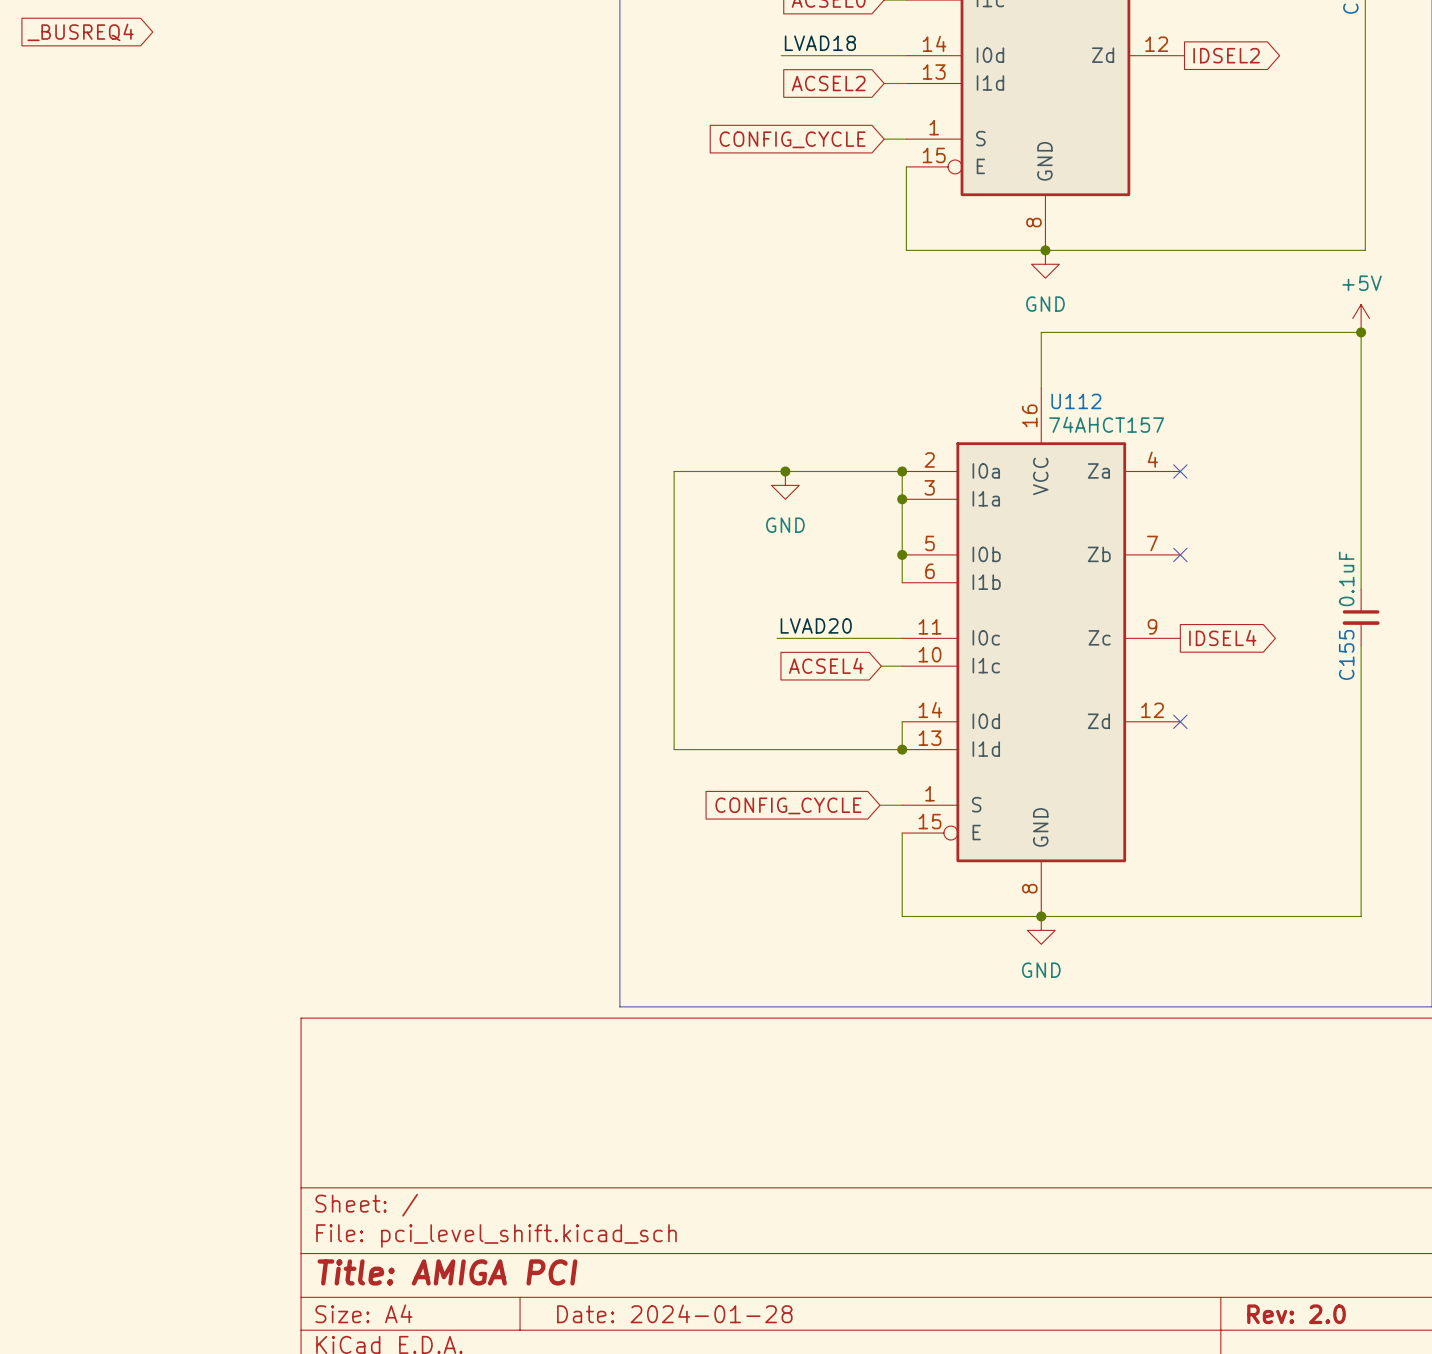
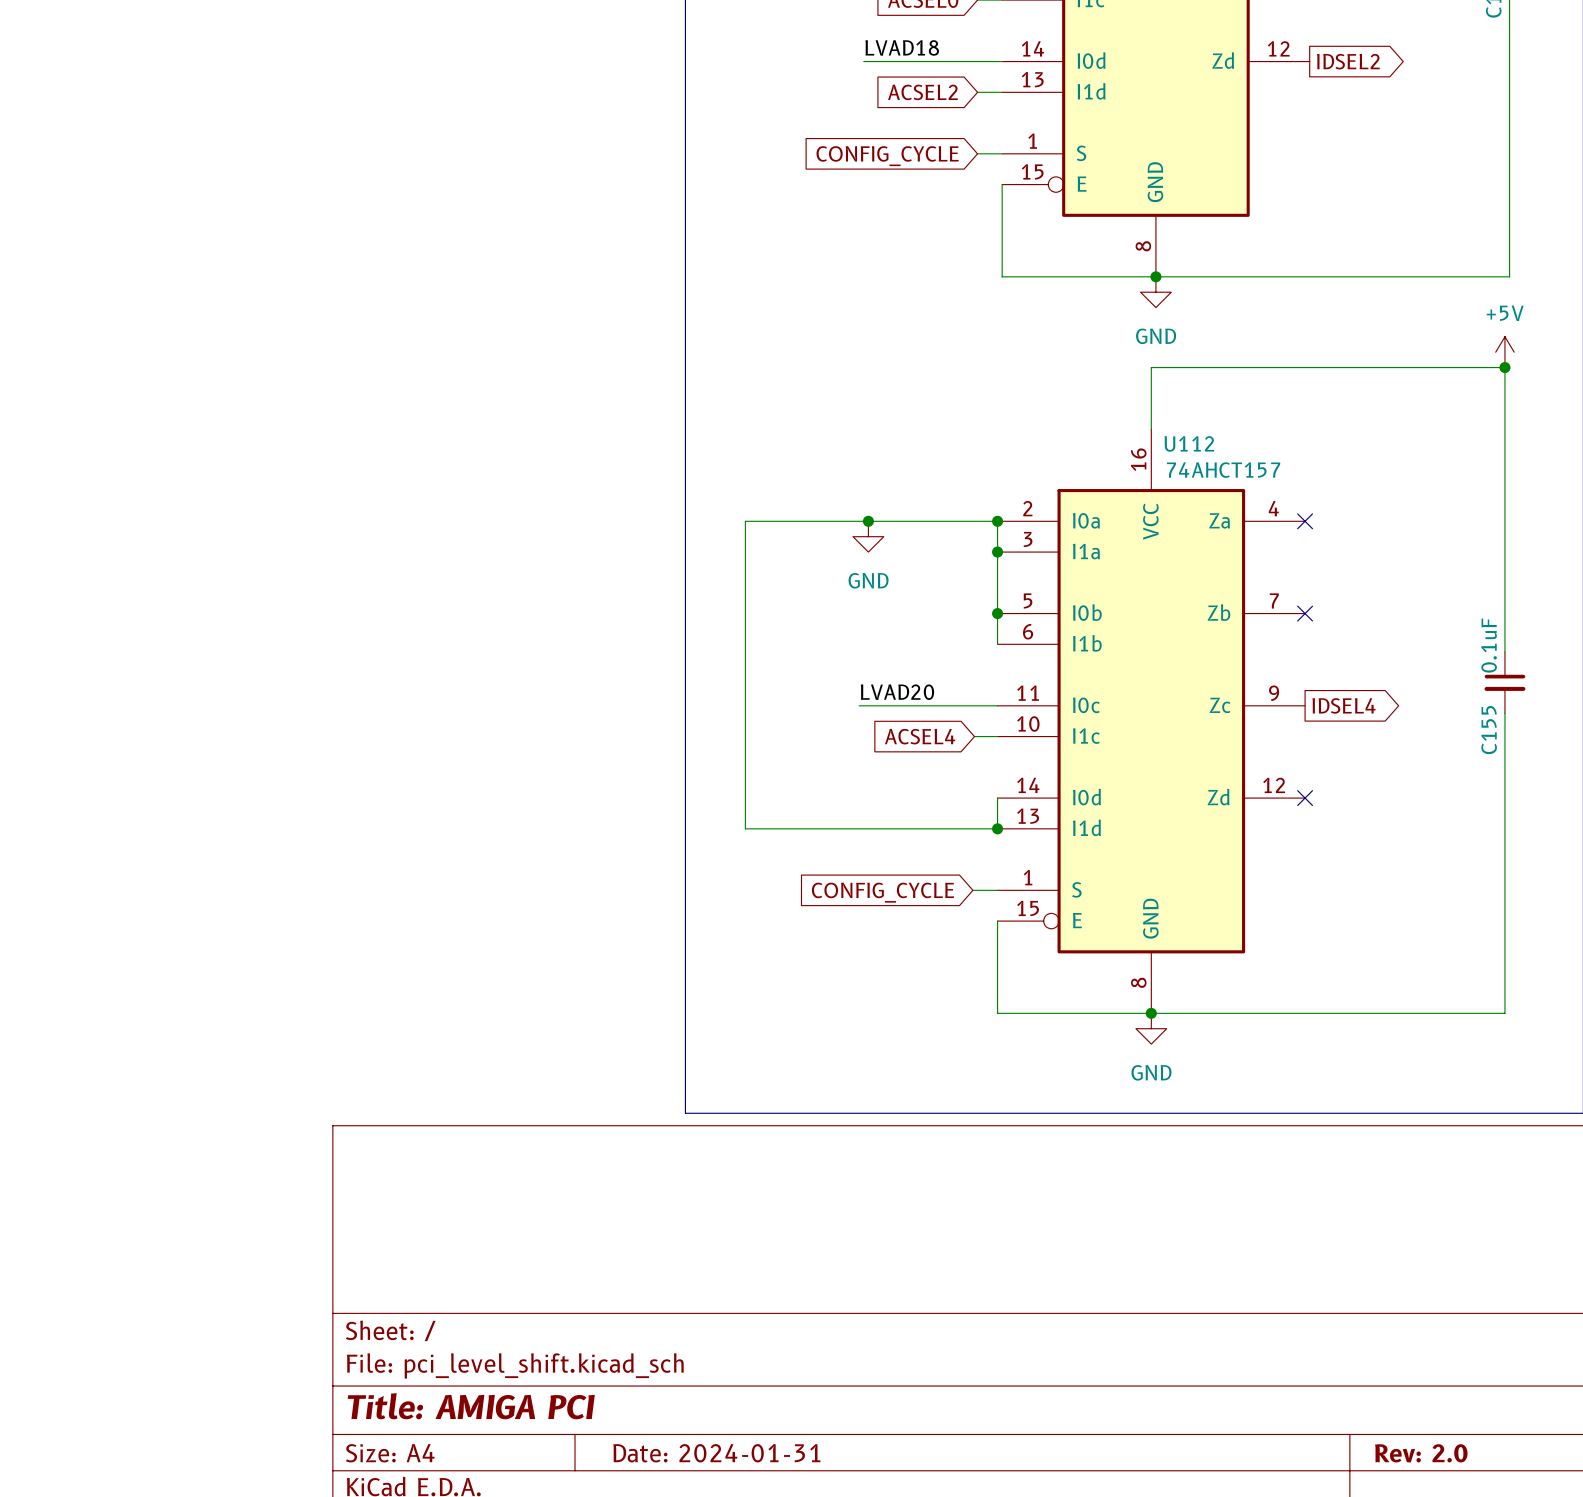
global label: _BUSREQ4 (80, 32) -> none
title block: Date: 2024-01-28 (674, 1313) -> Date: 2024-01-31 (716, 1453)

